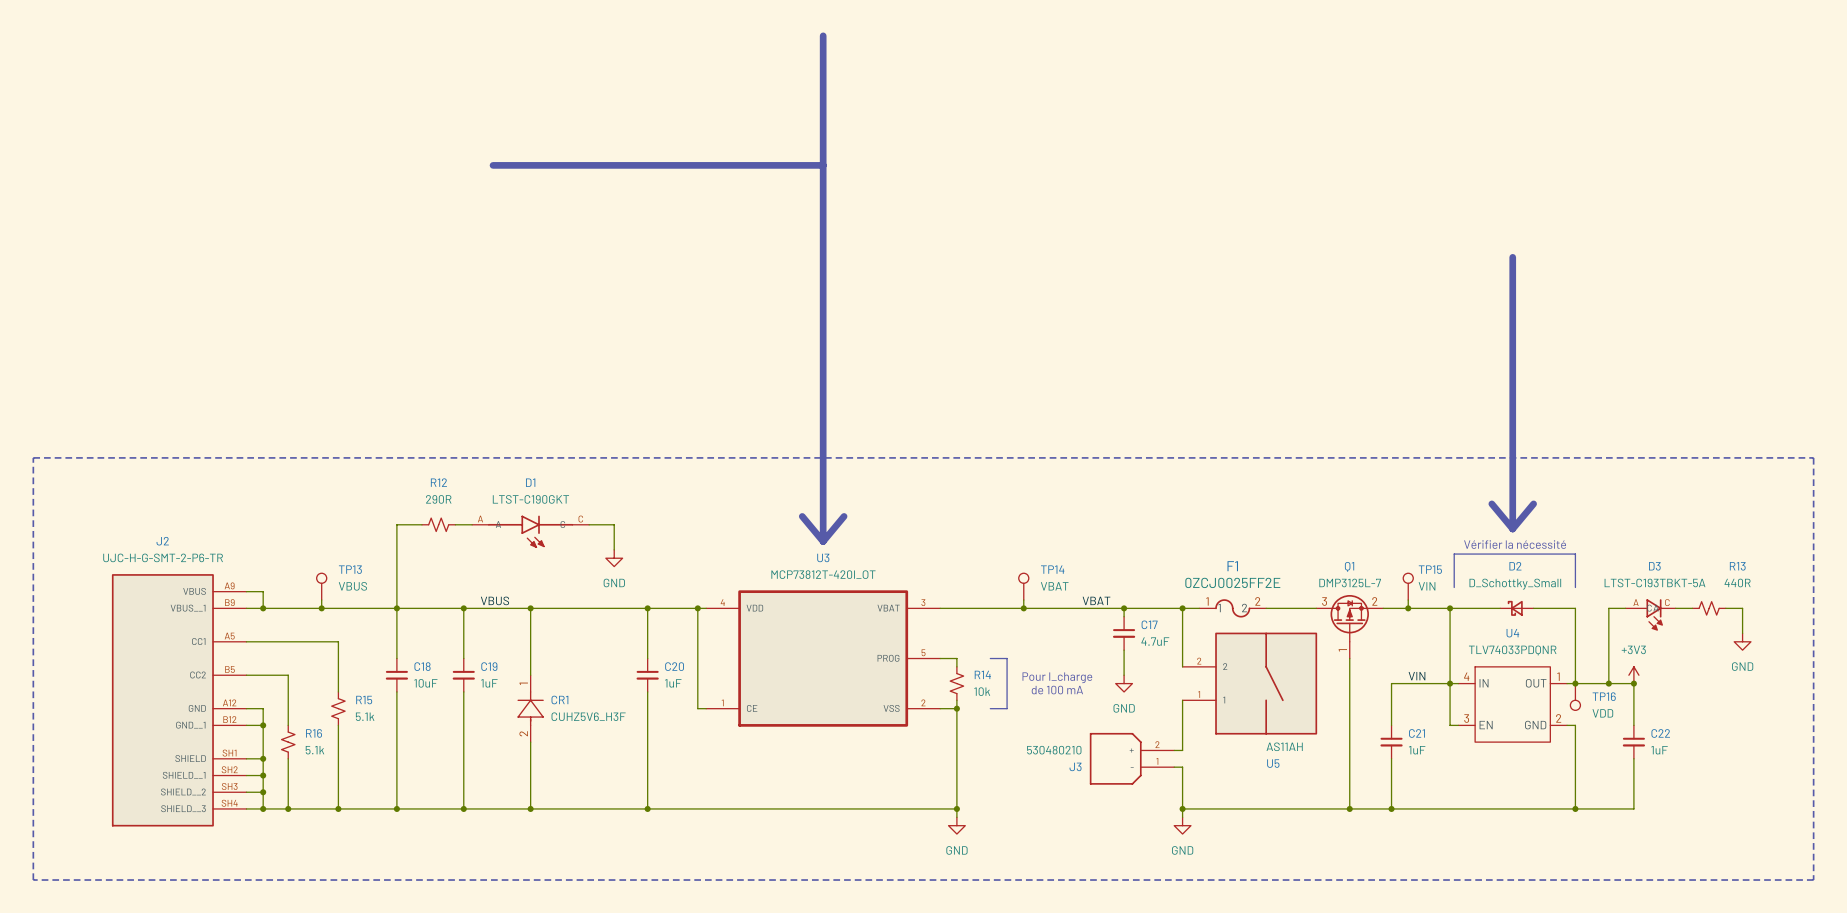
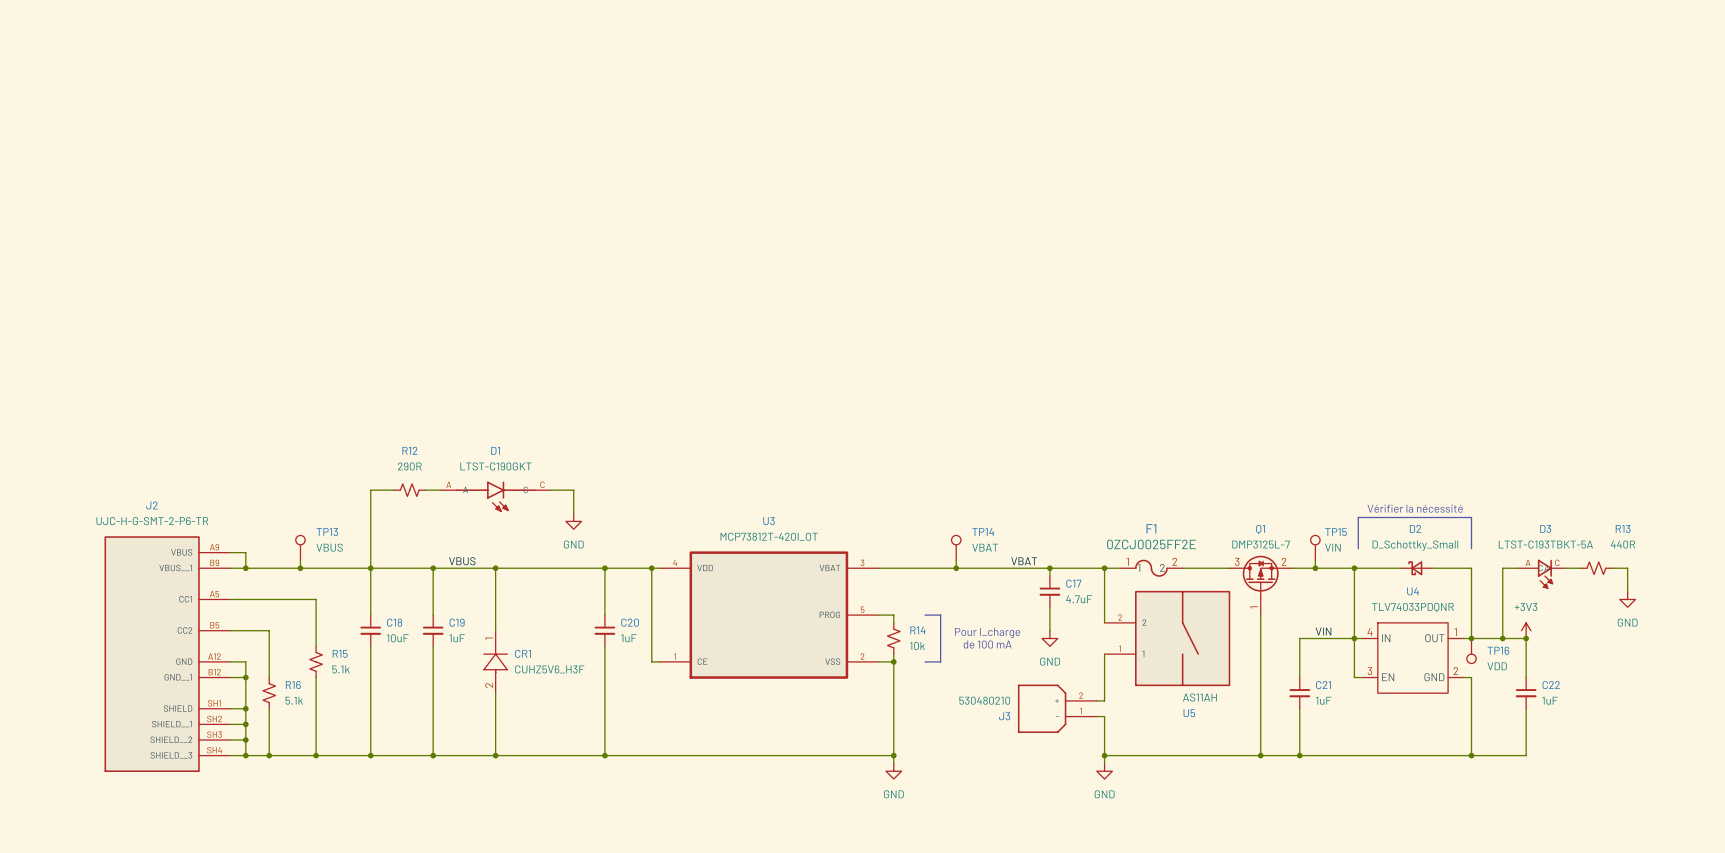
line: (823, 35) (823, 541) -> none
line: (493, 165) (823, 165) -> none
line: (1512, 257) (1512, 528) -> none
line: (33, 457) (1813, 457) (1813, 880) (33, 880) (33, 457) -> none
line: (1491, 503) (1512, 528) -> none
line: (1533, 503) (1512, 528) -> none
line: (802, 516) (823, 541) -> none
line: (844, 516) (823, 541) -> none

